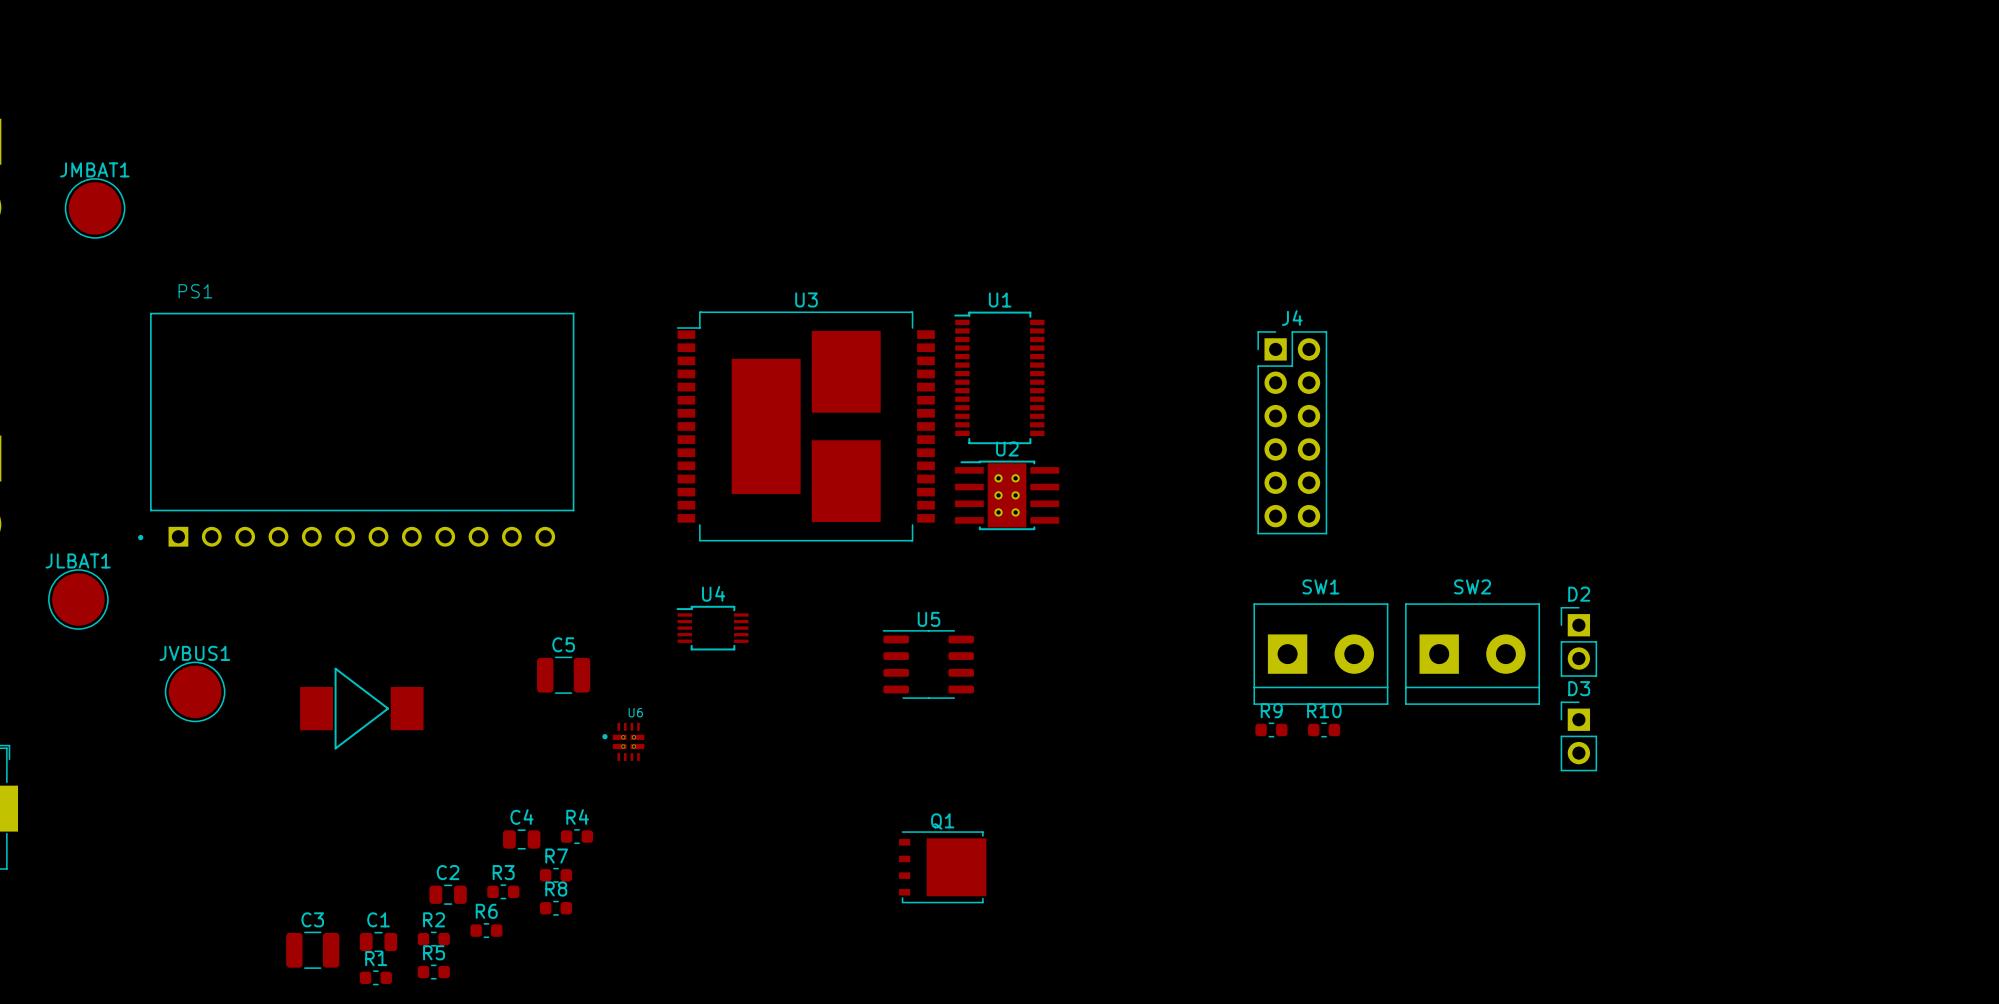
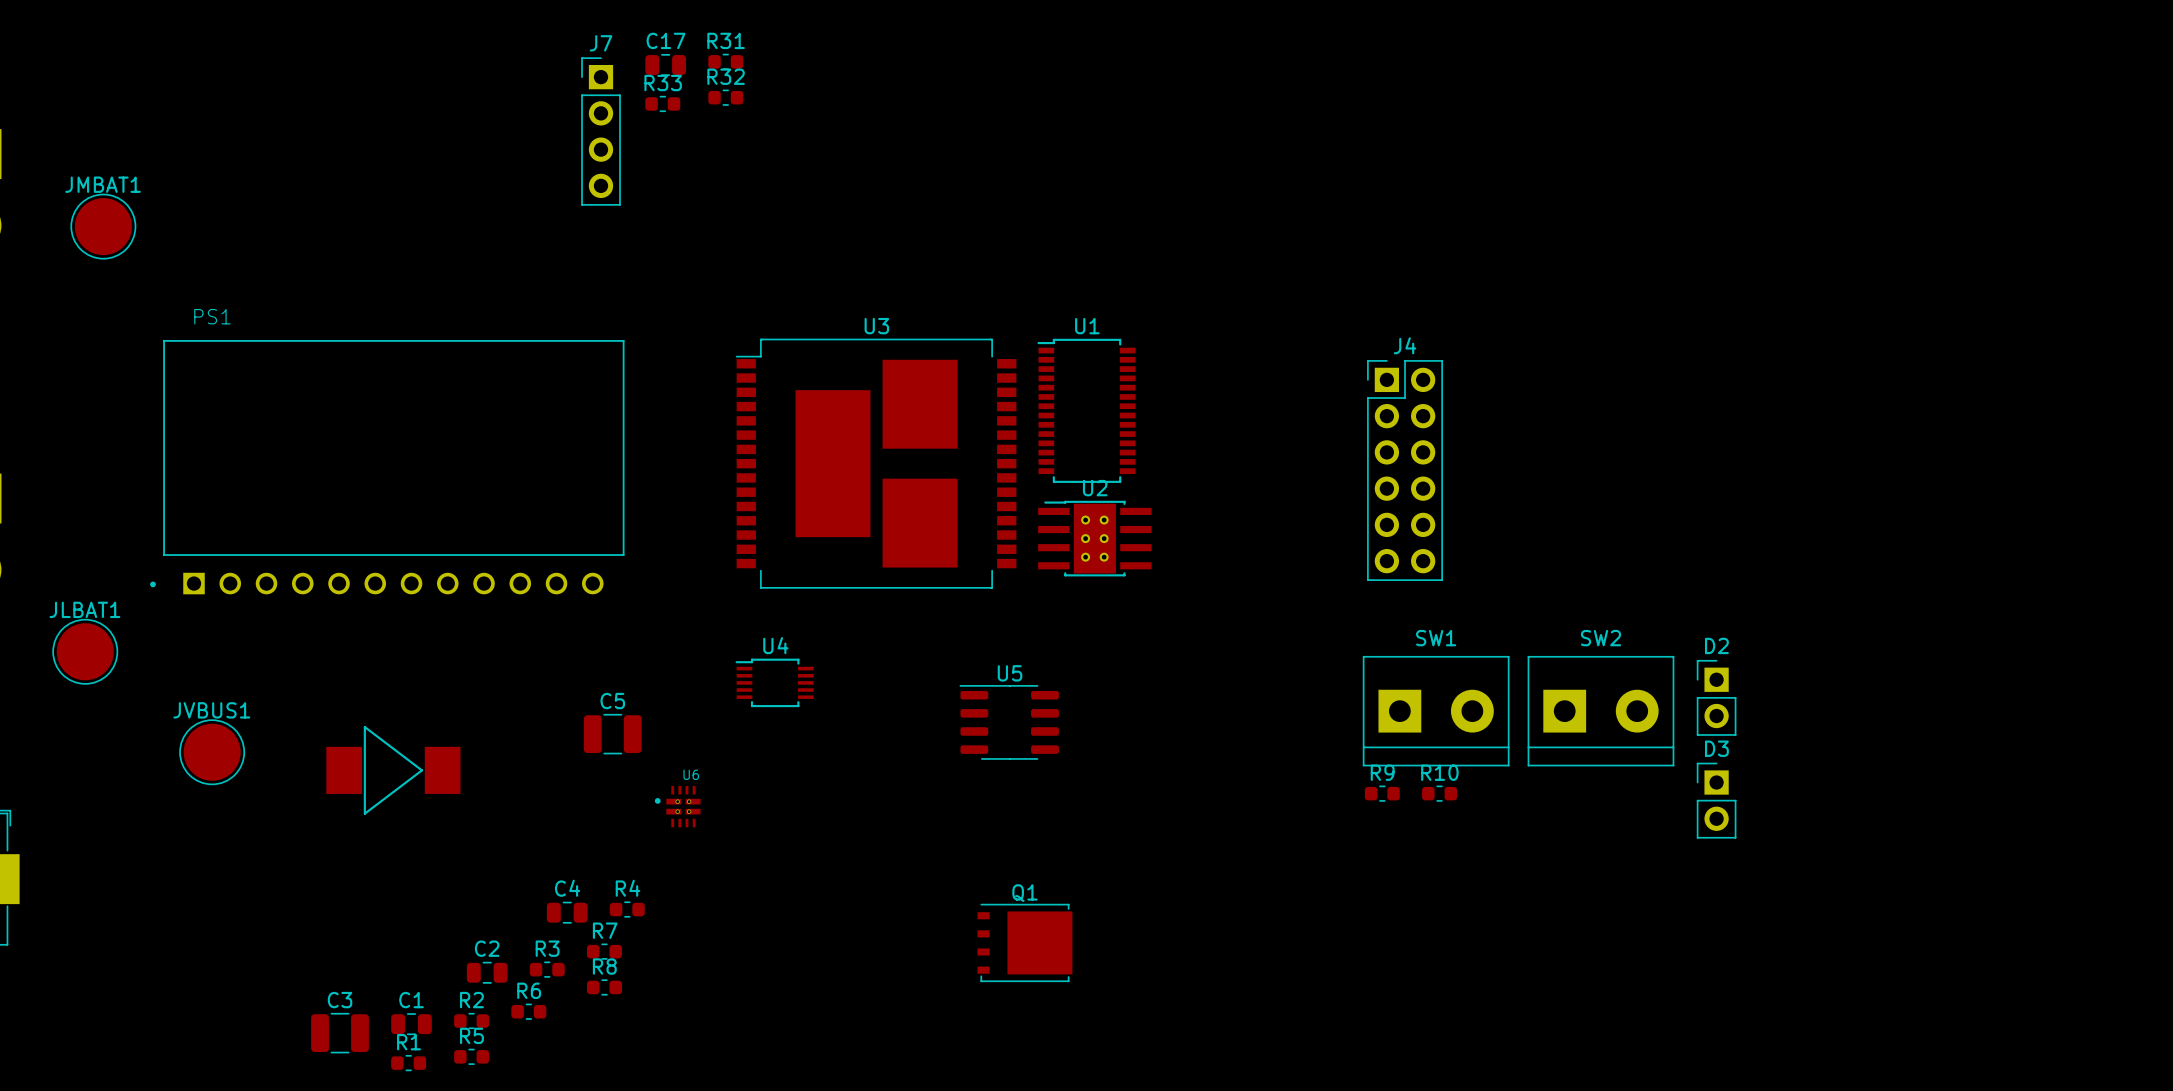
R31: none -> (725, 61)
C17: none -> (665, 64)
R32: none -> (725, 97)
R33: none -> (662, 103)
J7: none -> (600, 131)

